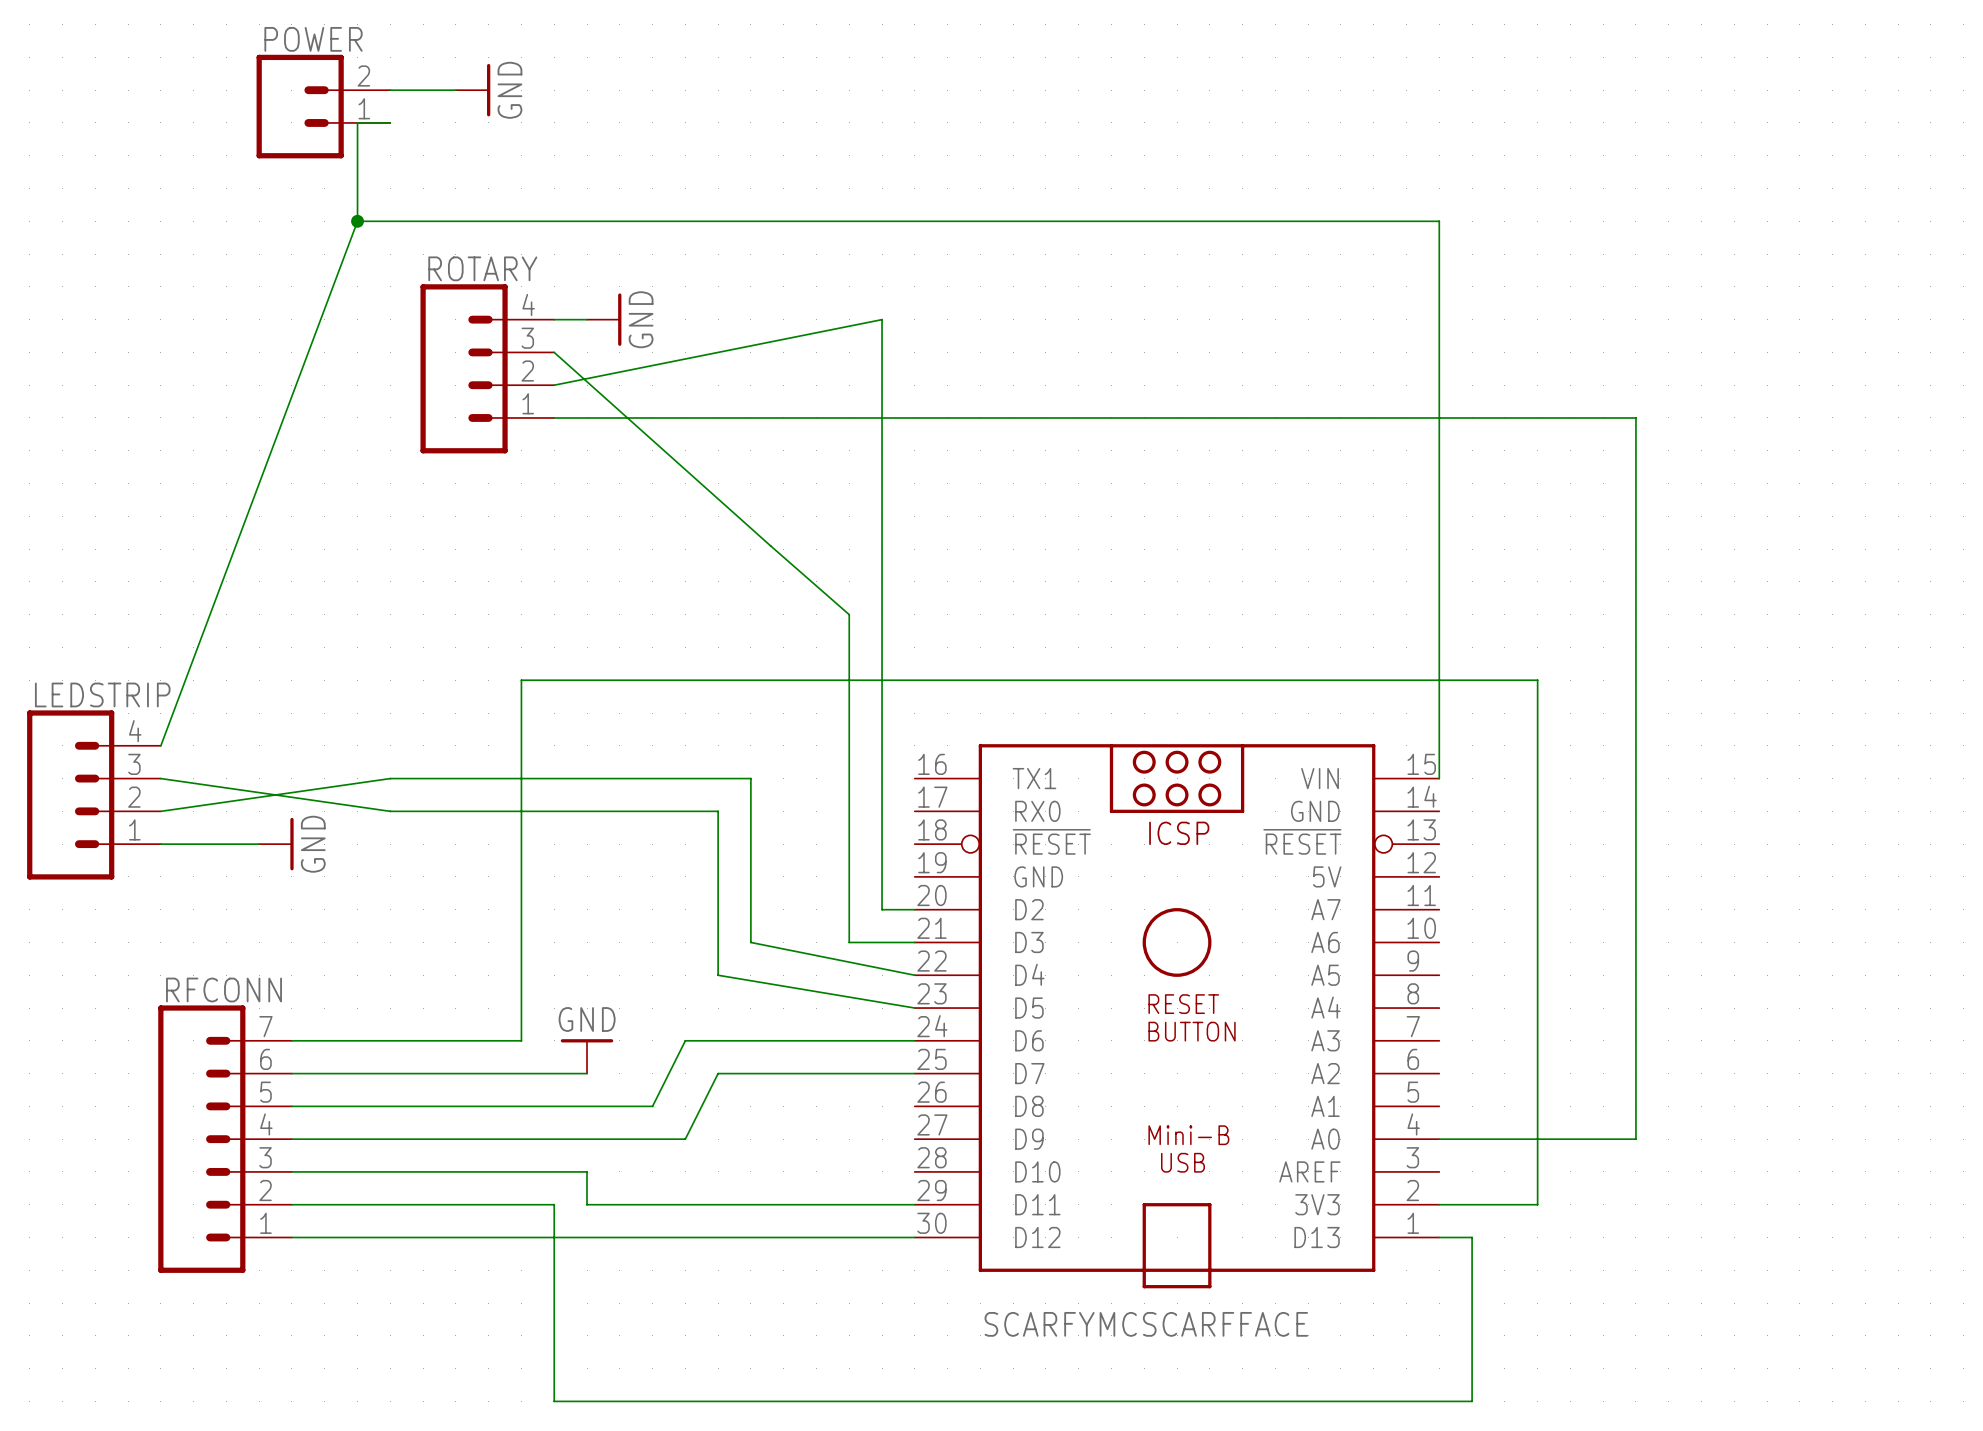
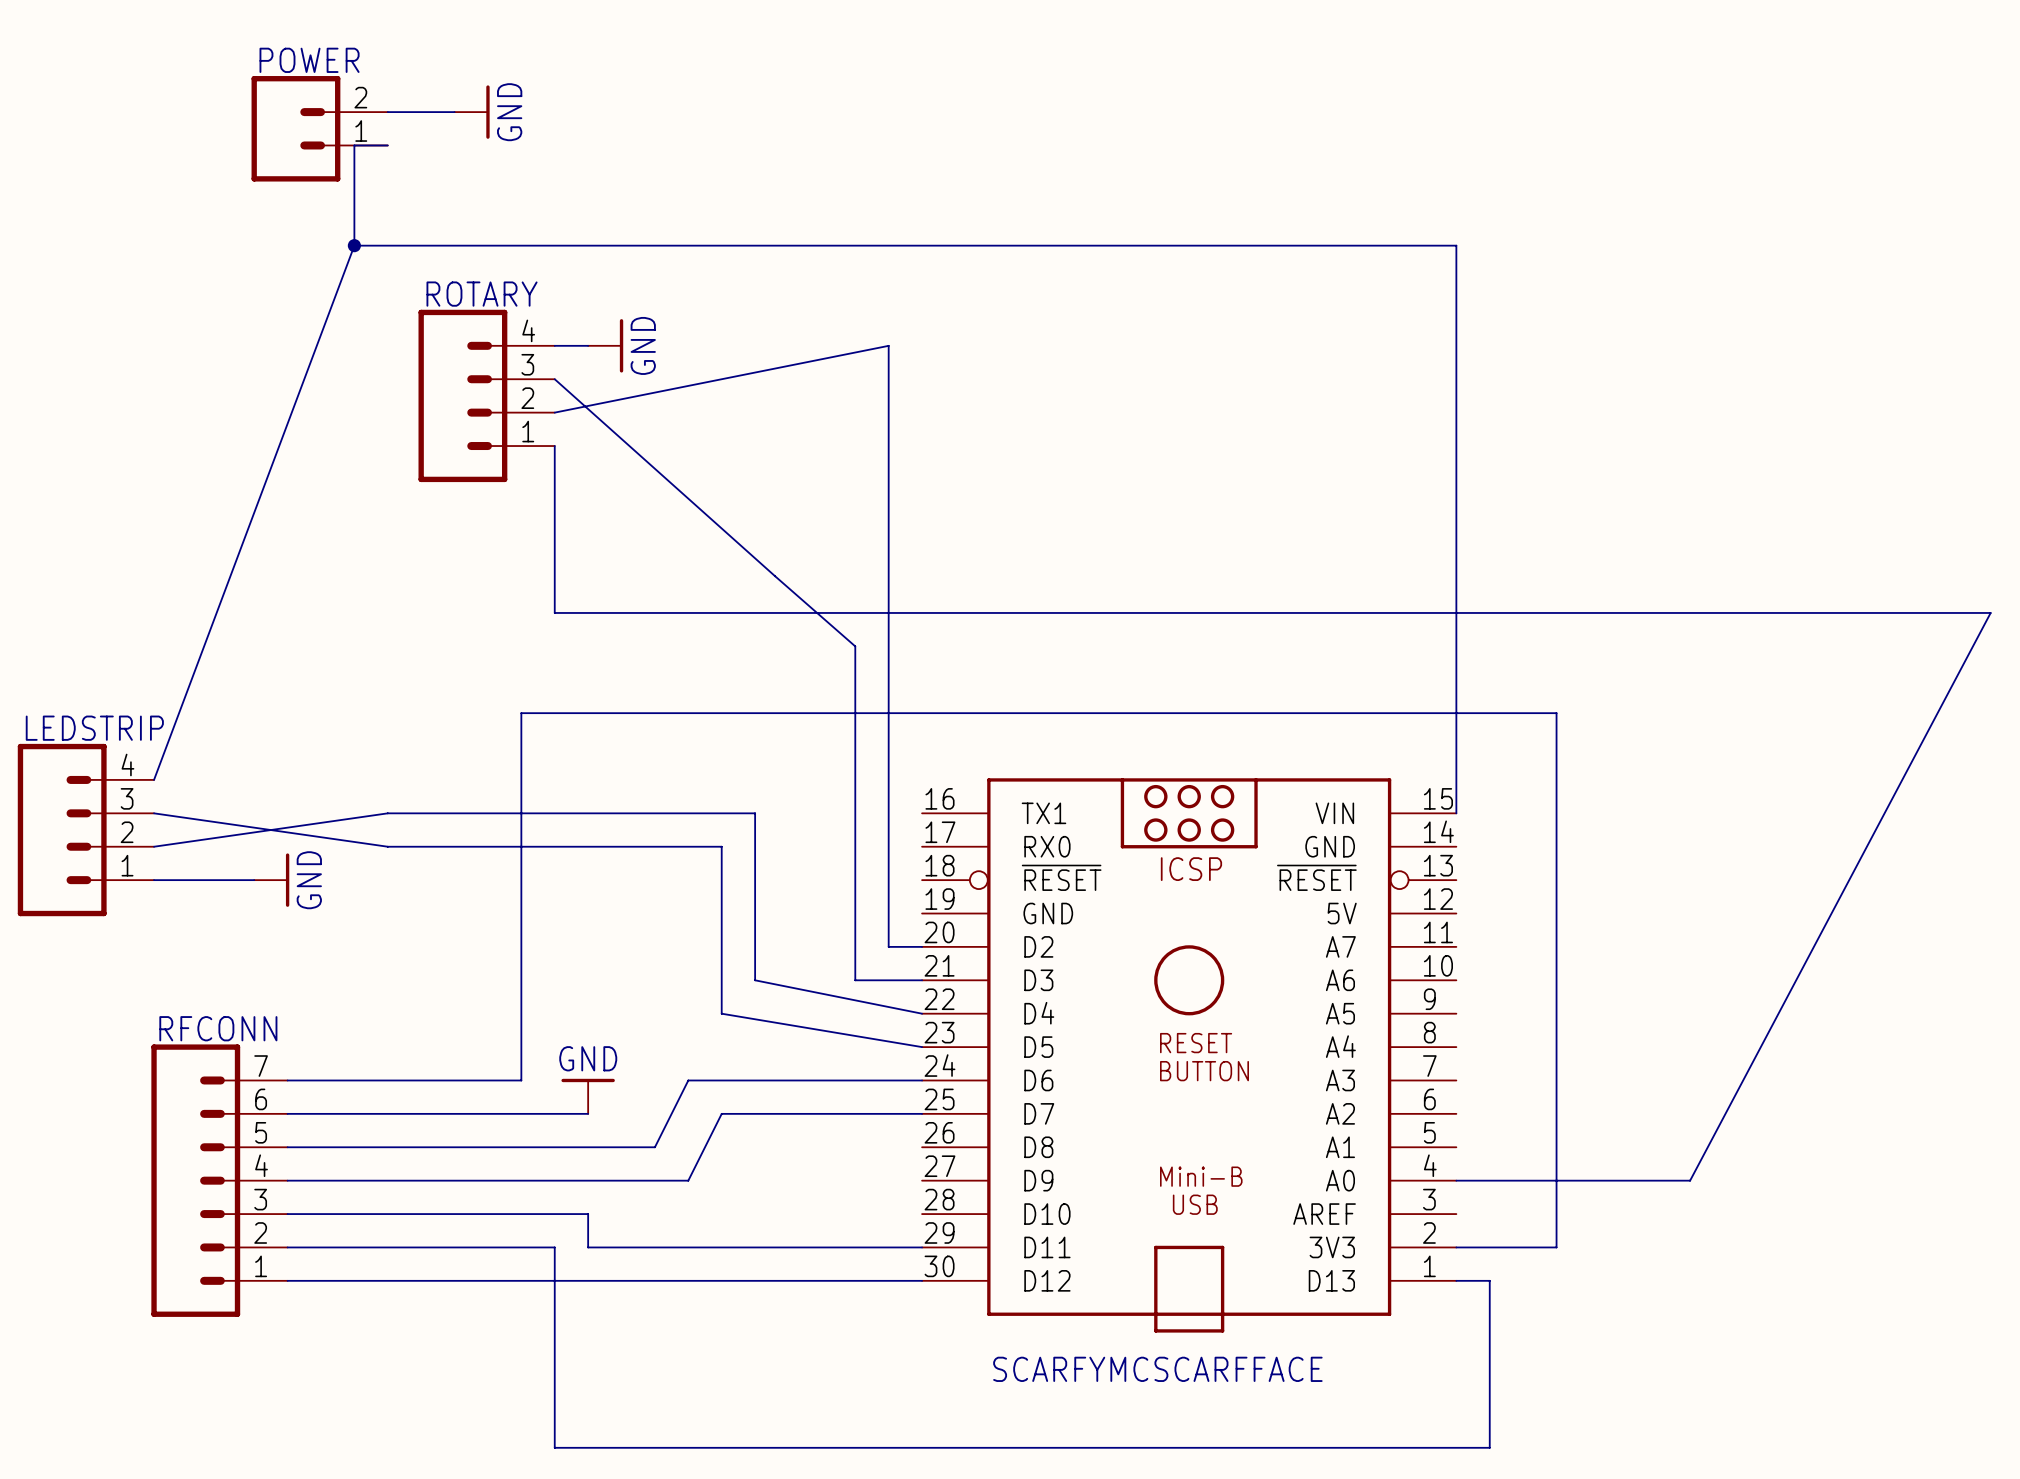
wire: (554, 417) (1635, 417) (1635, 1139) -> (554, 446) (554, 612) (1990, 612) (1690, 1180) (1656, 1180)

